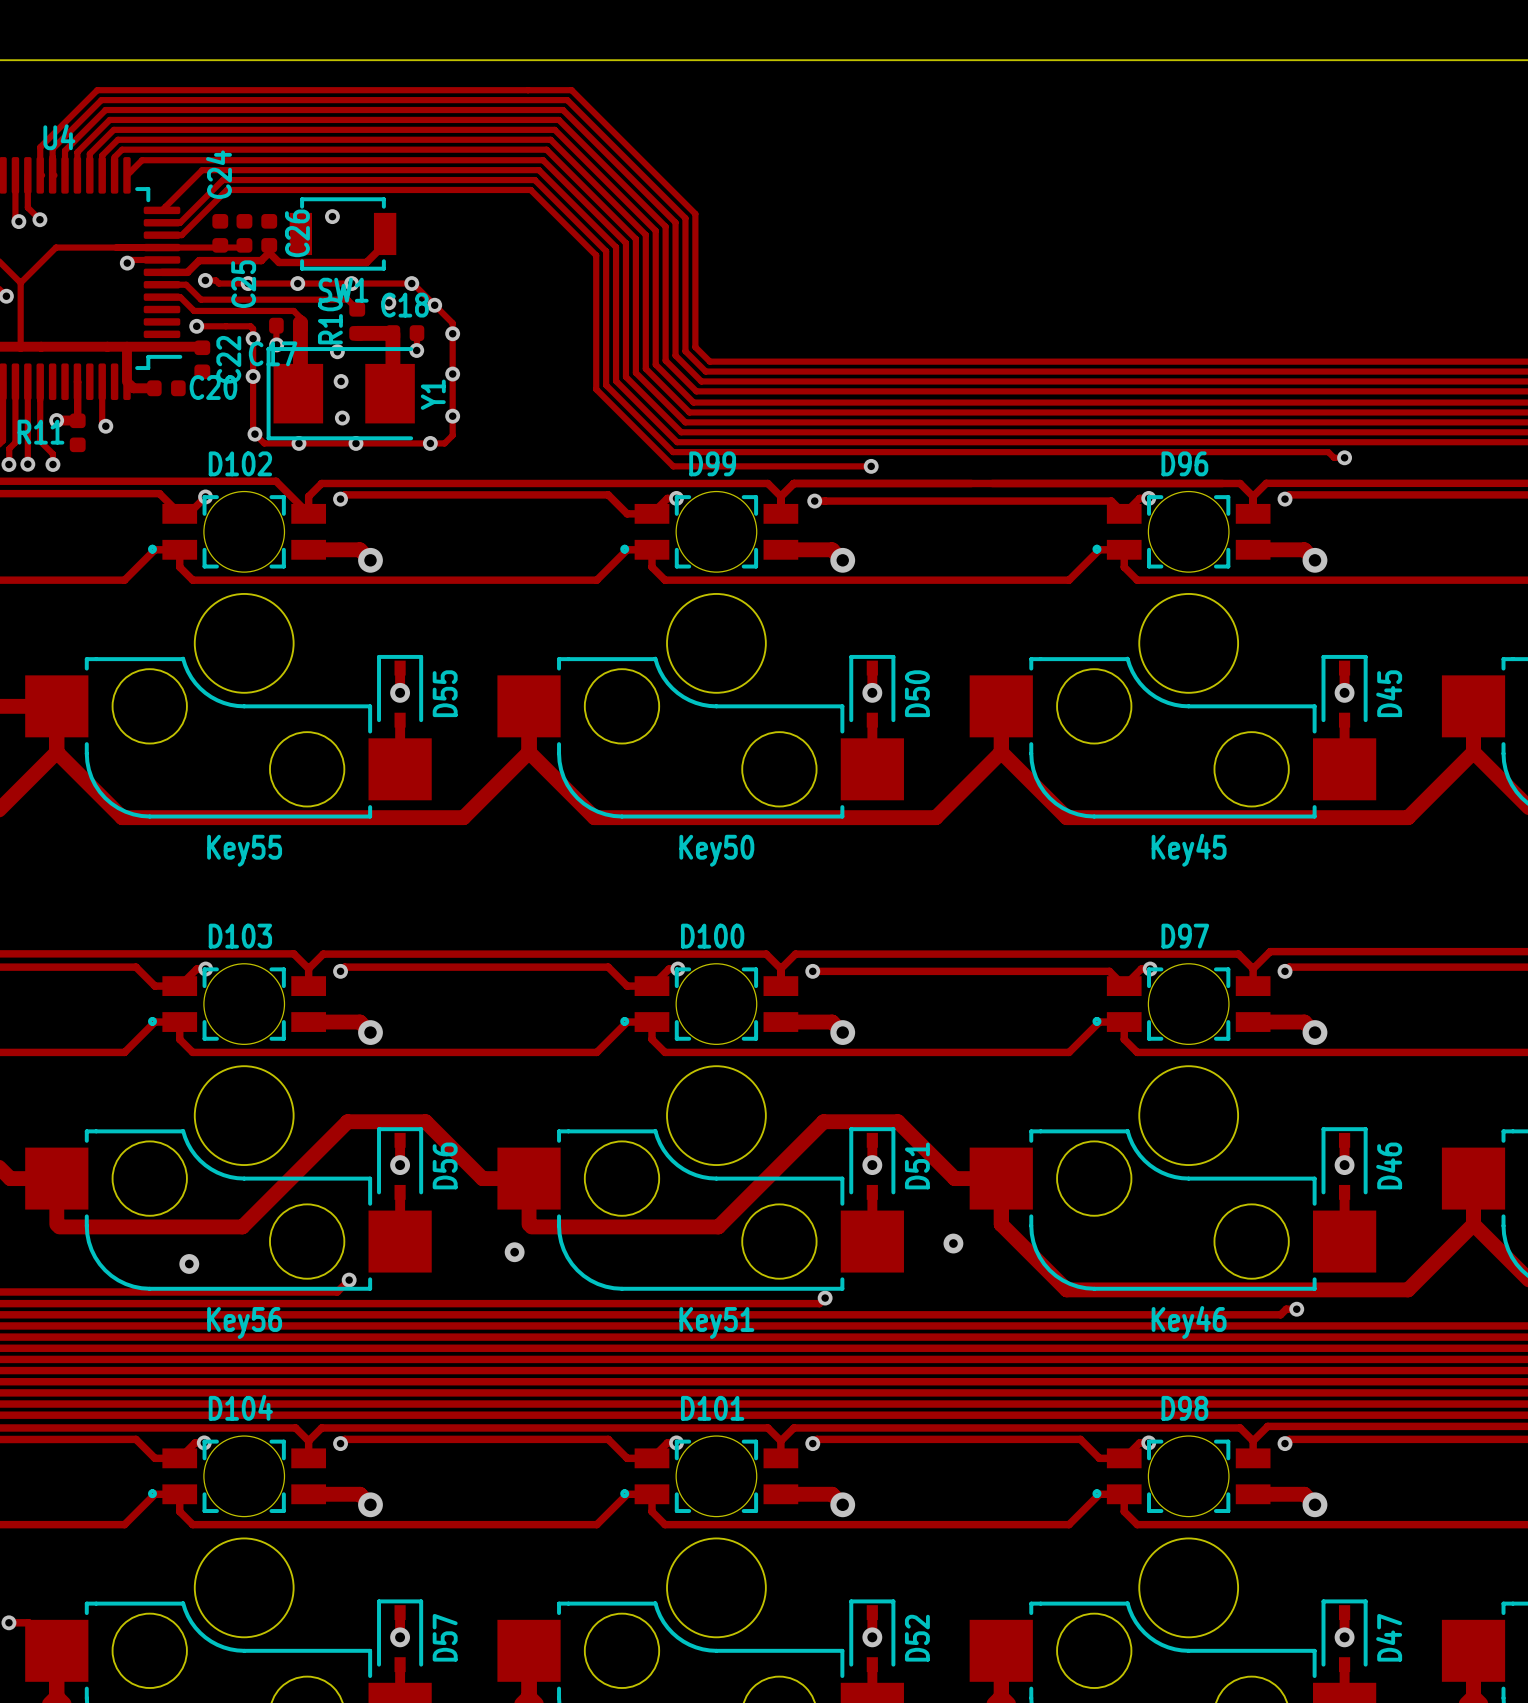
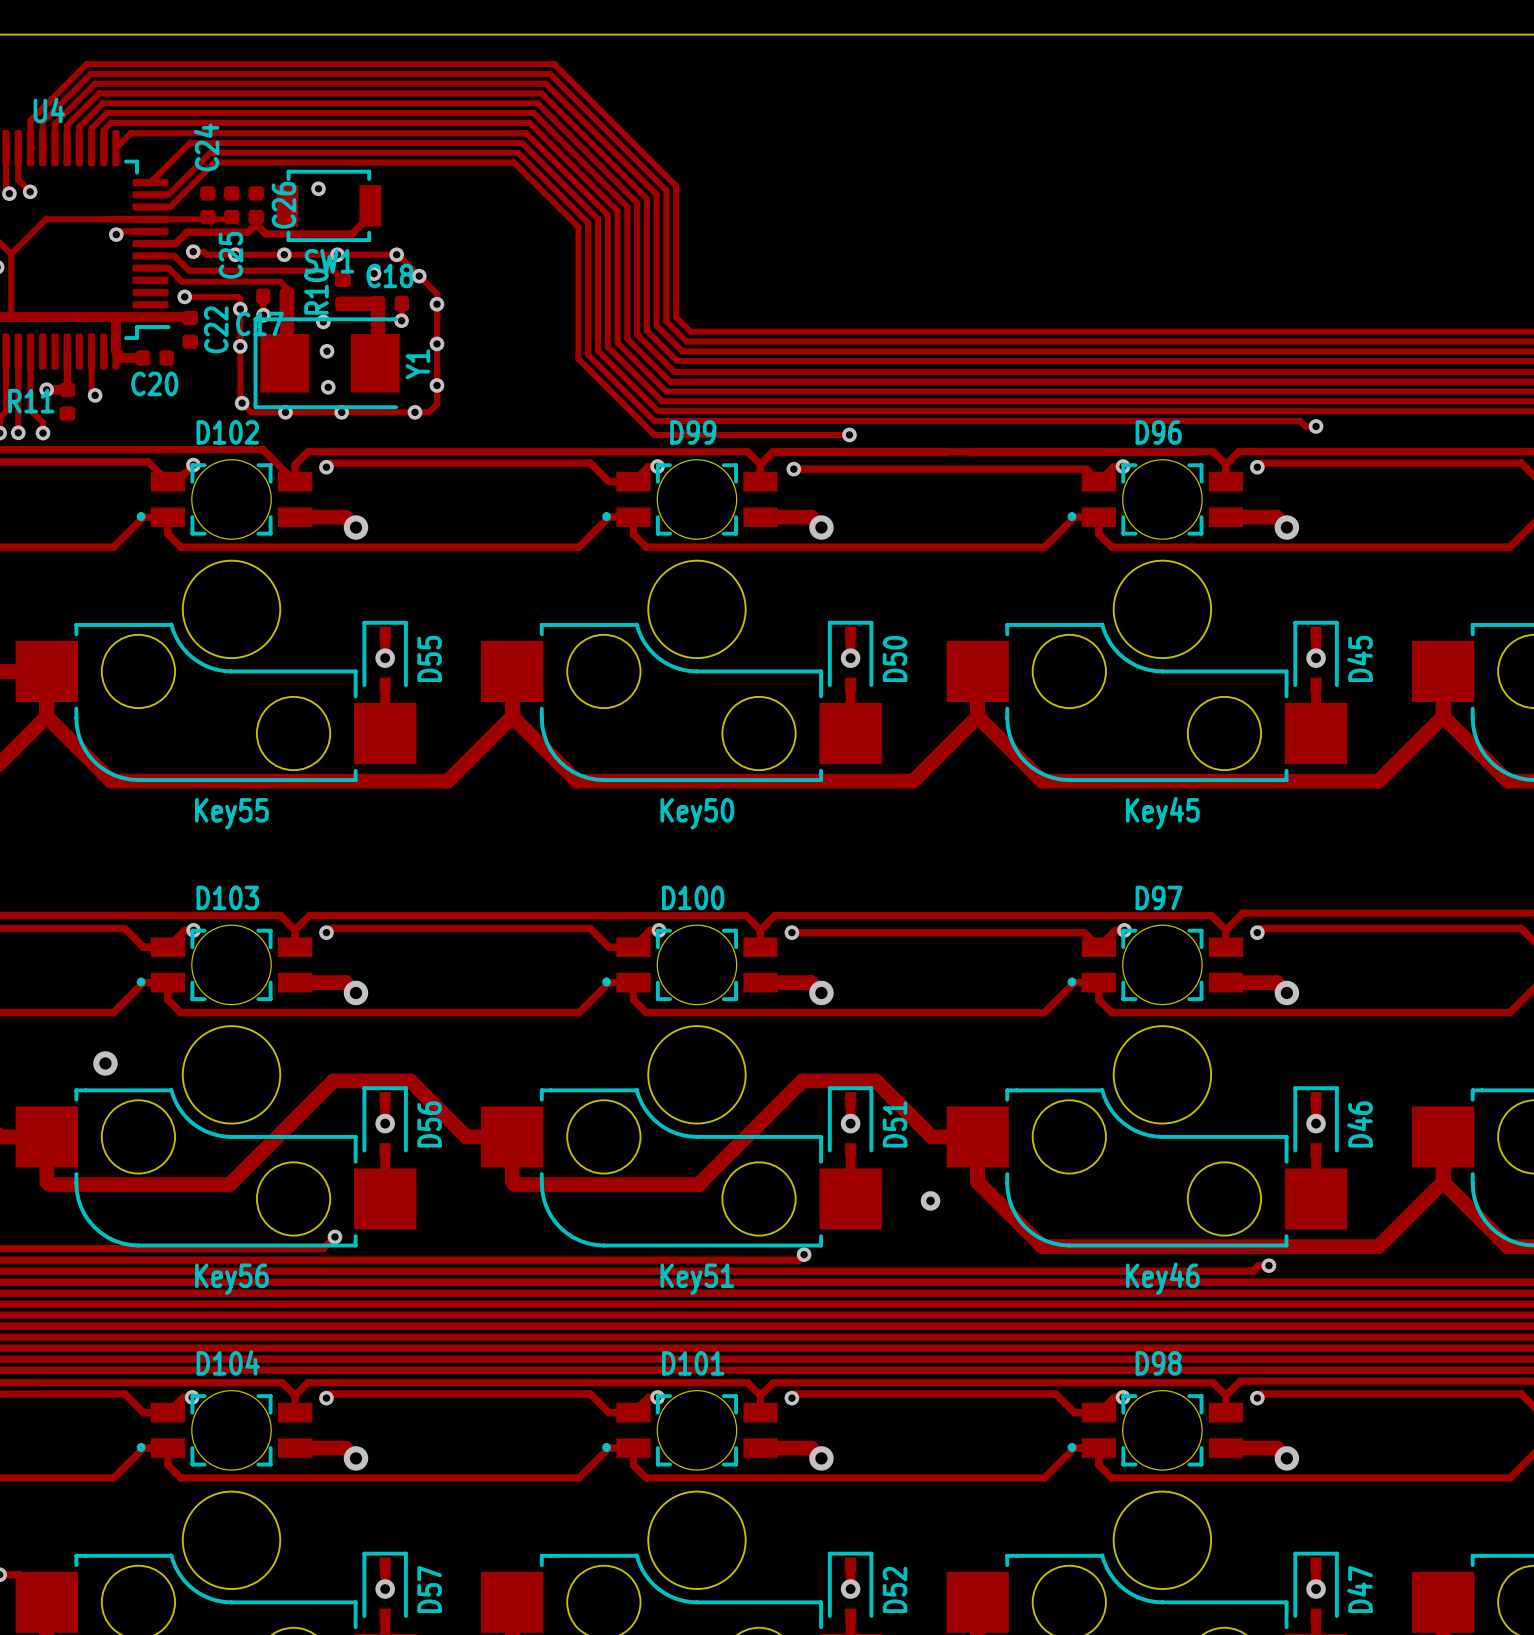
C20 name position: C20 (213, 387) -> C20 (154, 383)
via: none -> (105, 1063)
via: (514, 1252) -> none
via: (189, 1263) -> none

